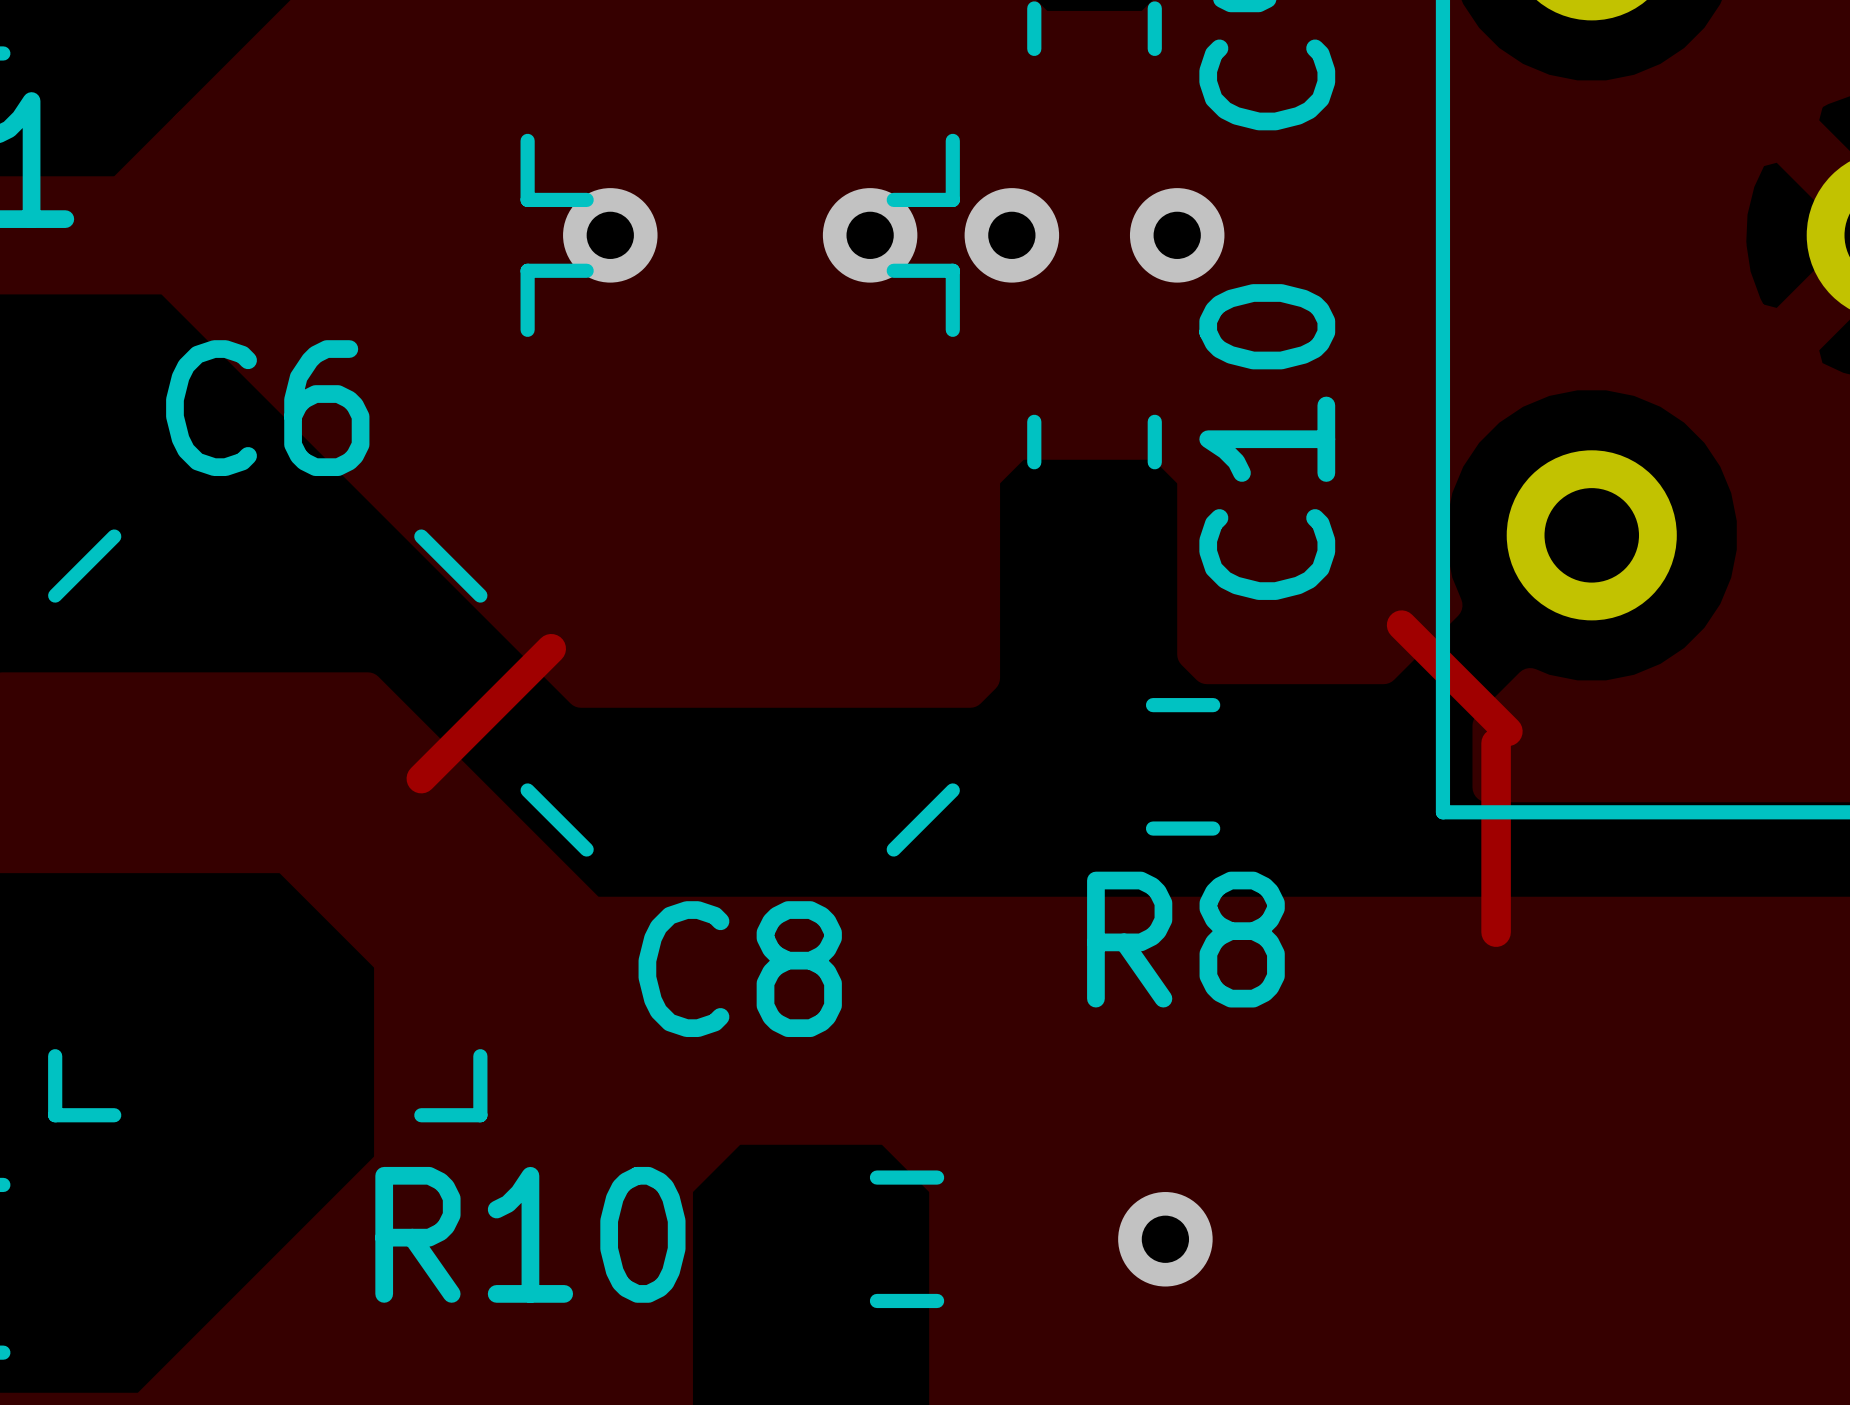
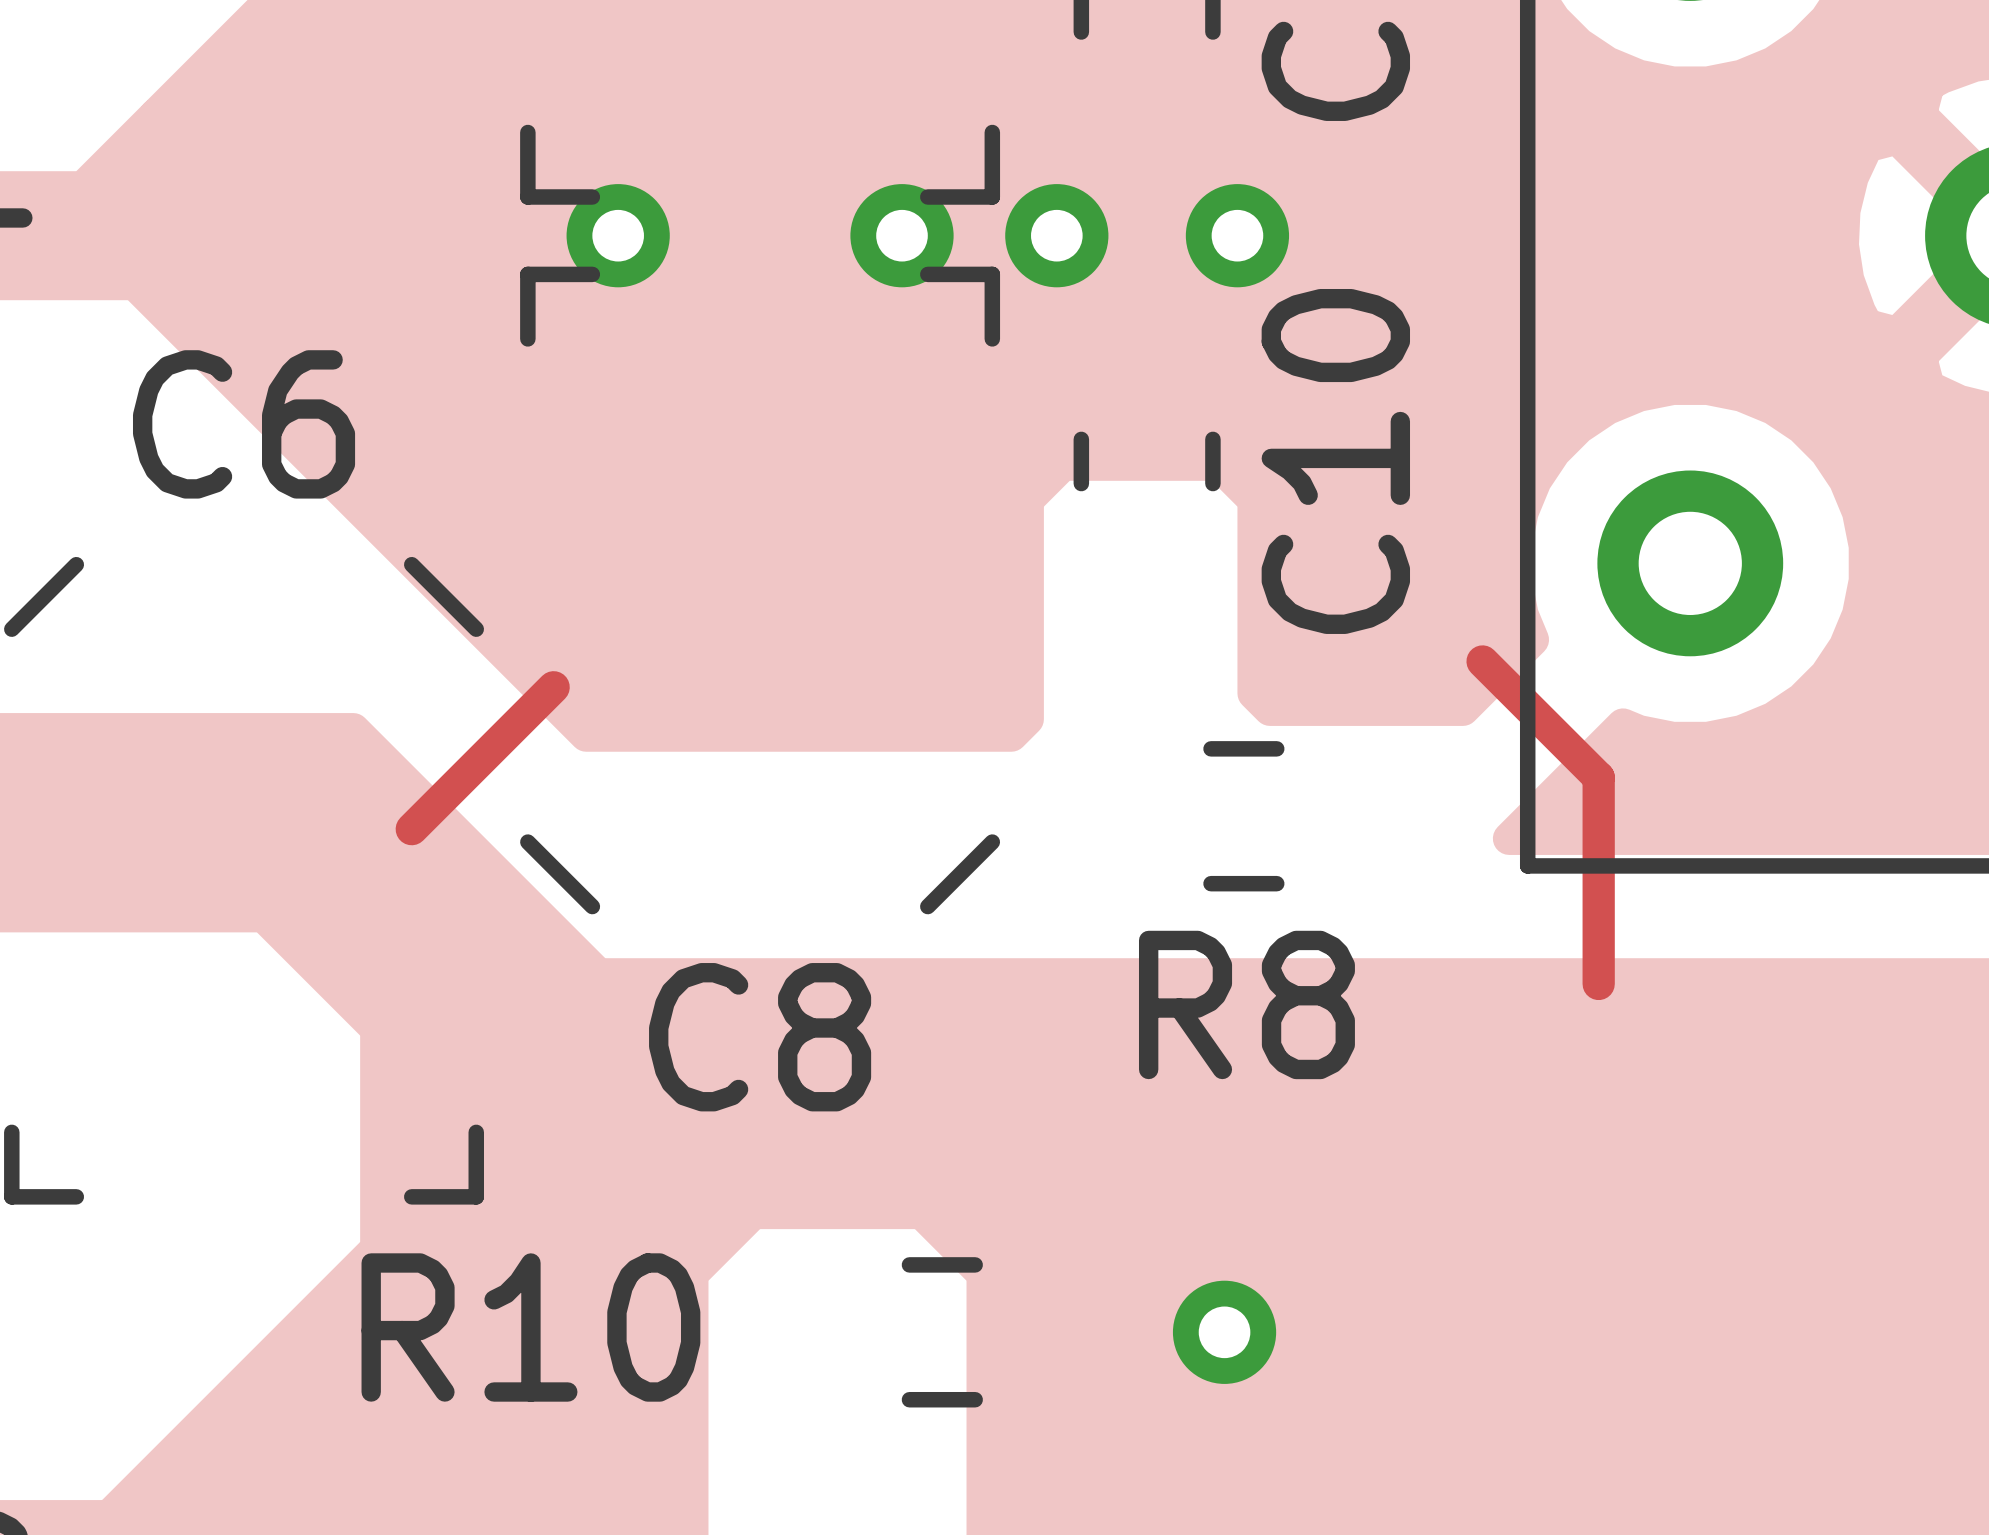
track: (1496, 743) (1496, 932) -> (1598, 777) (1598, 983)

